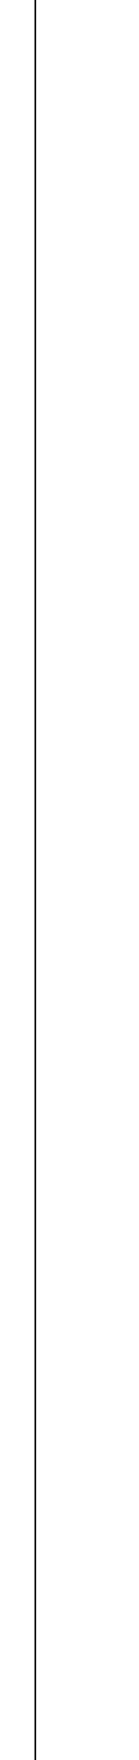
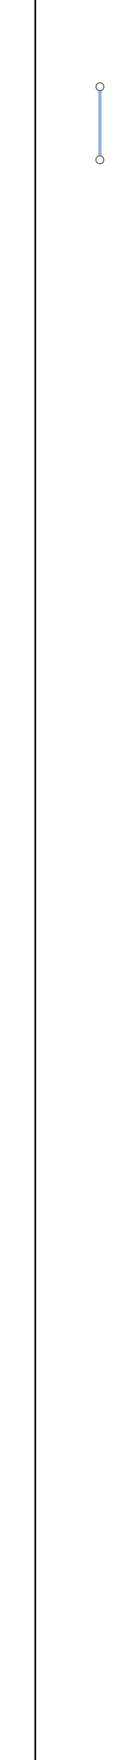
track: none -> (99, 86) (99, 159)
via: none -> (99, 86)
via: none -> (99, 159)

